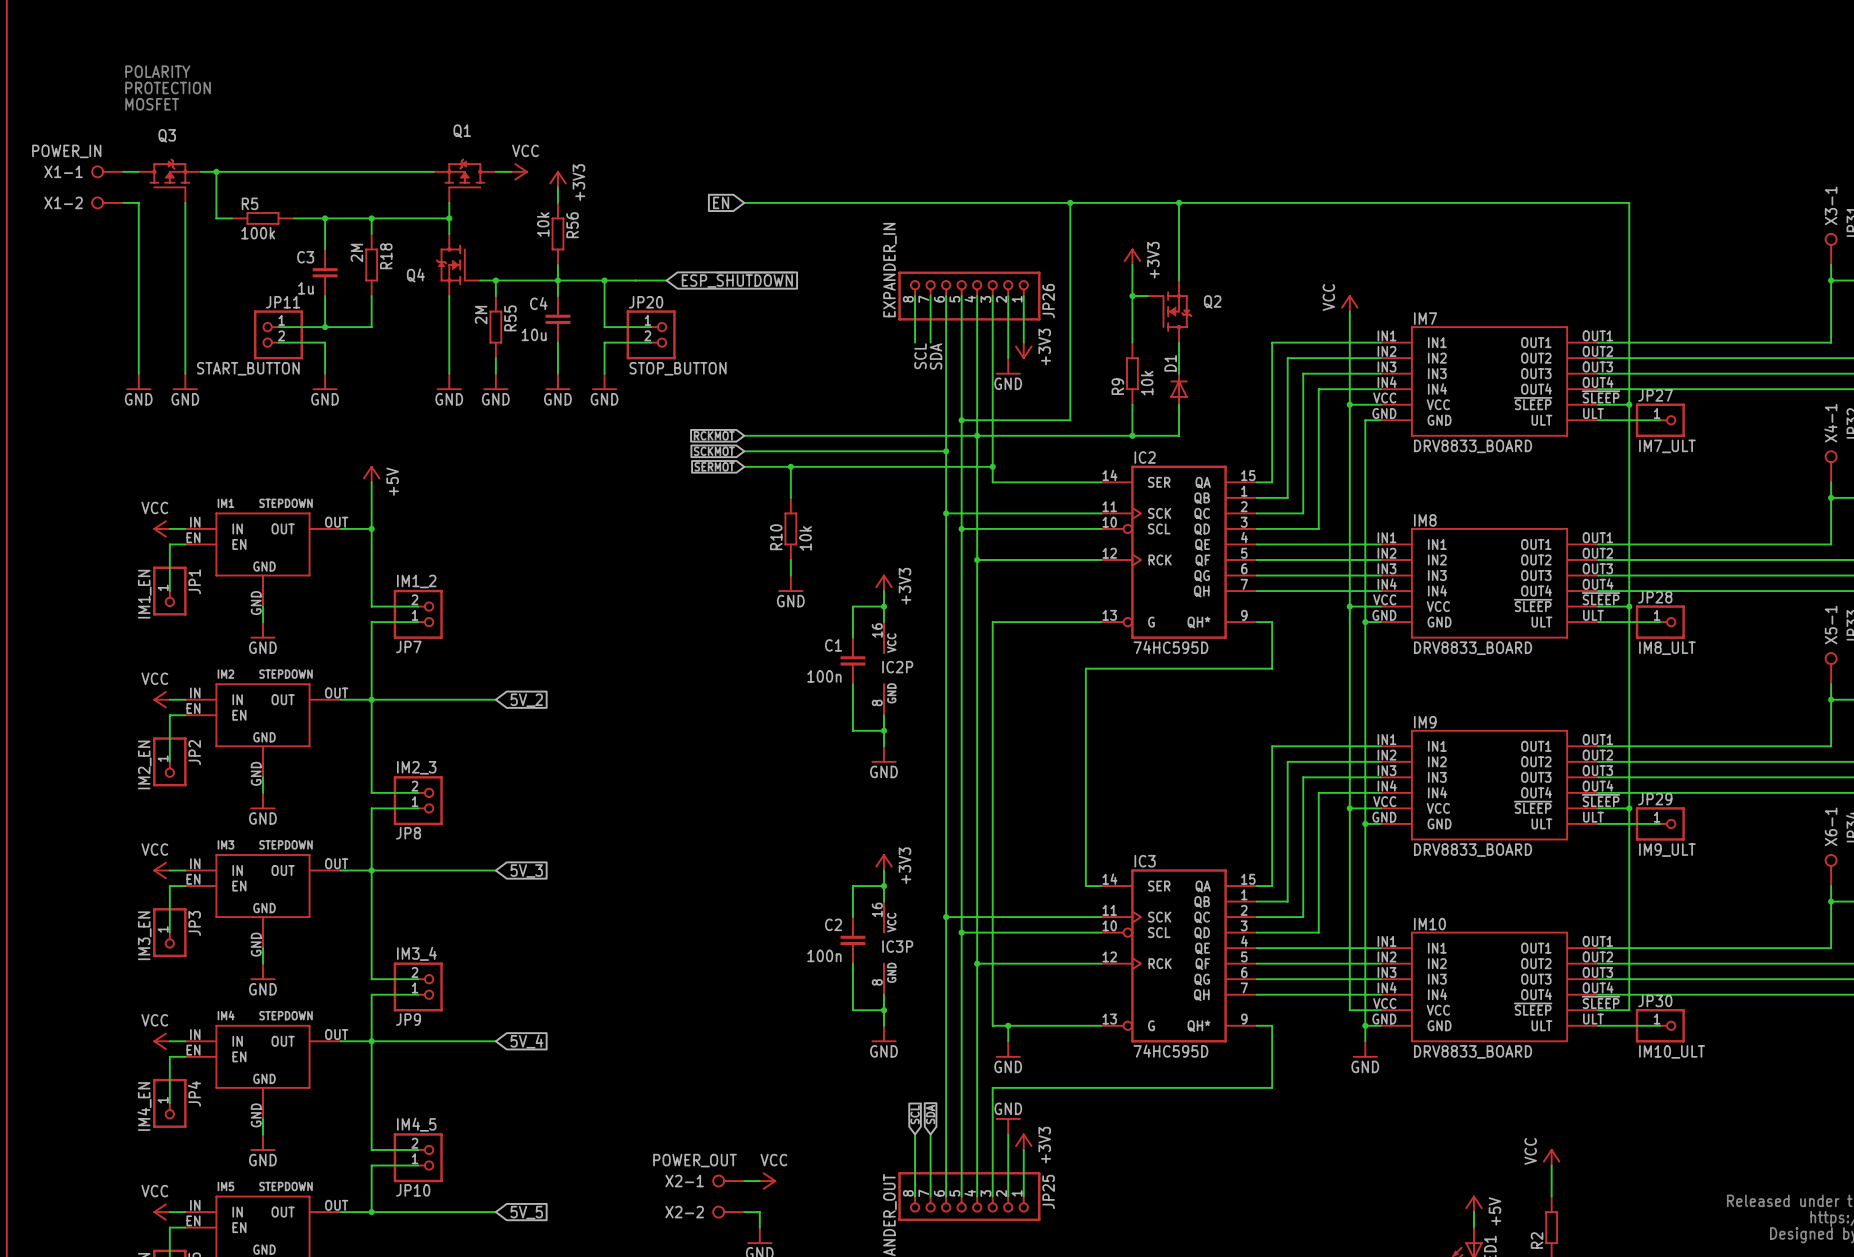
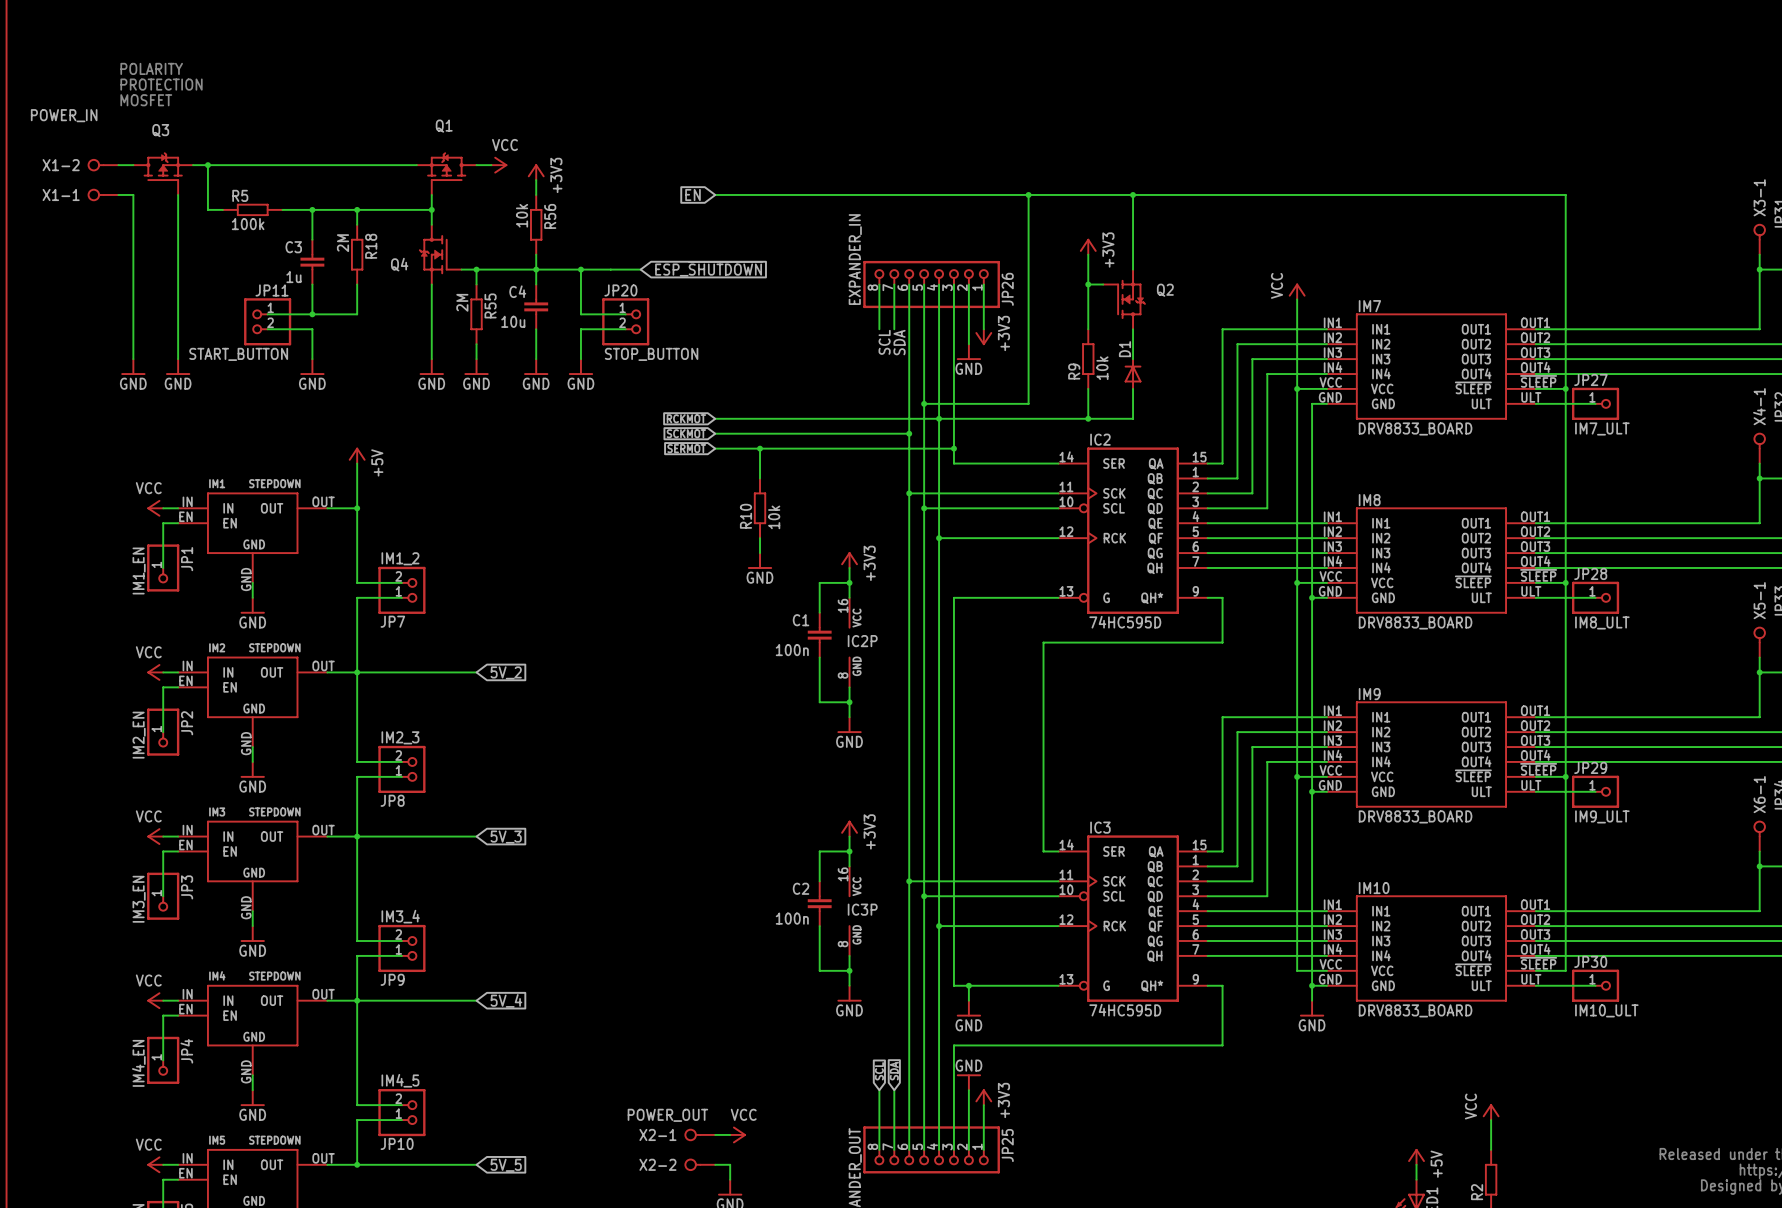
X1-1 value: none -> POWER_IN (64, 115)
X1-2 value: POWER_IN (66, 151) -> none
X1-1 name: X1-1 (63, 171) -> X1-2 (61, 165)
X1-2 name: X1-2 (63, 202) -> X1-1 (61, 194)

